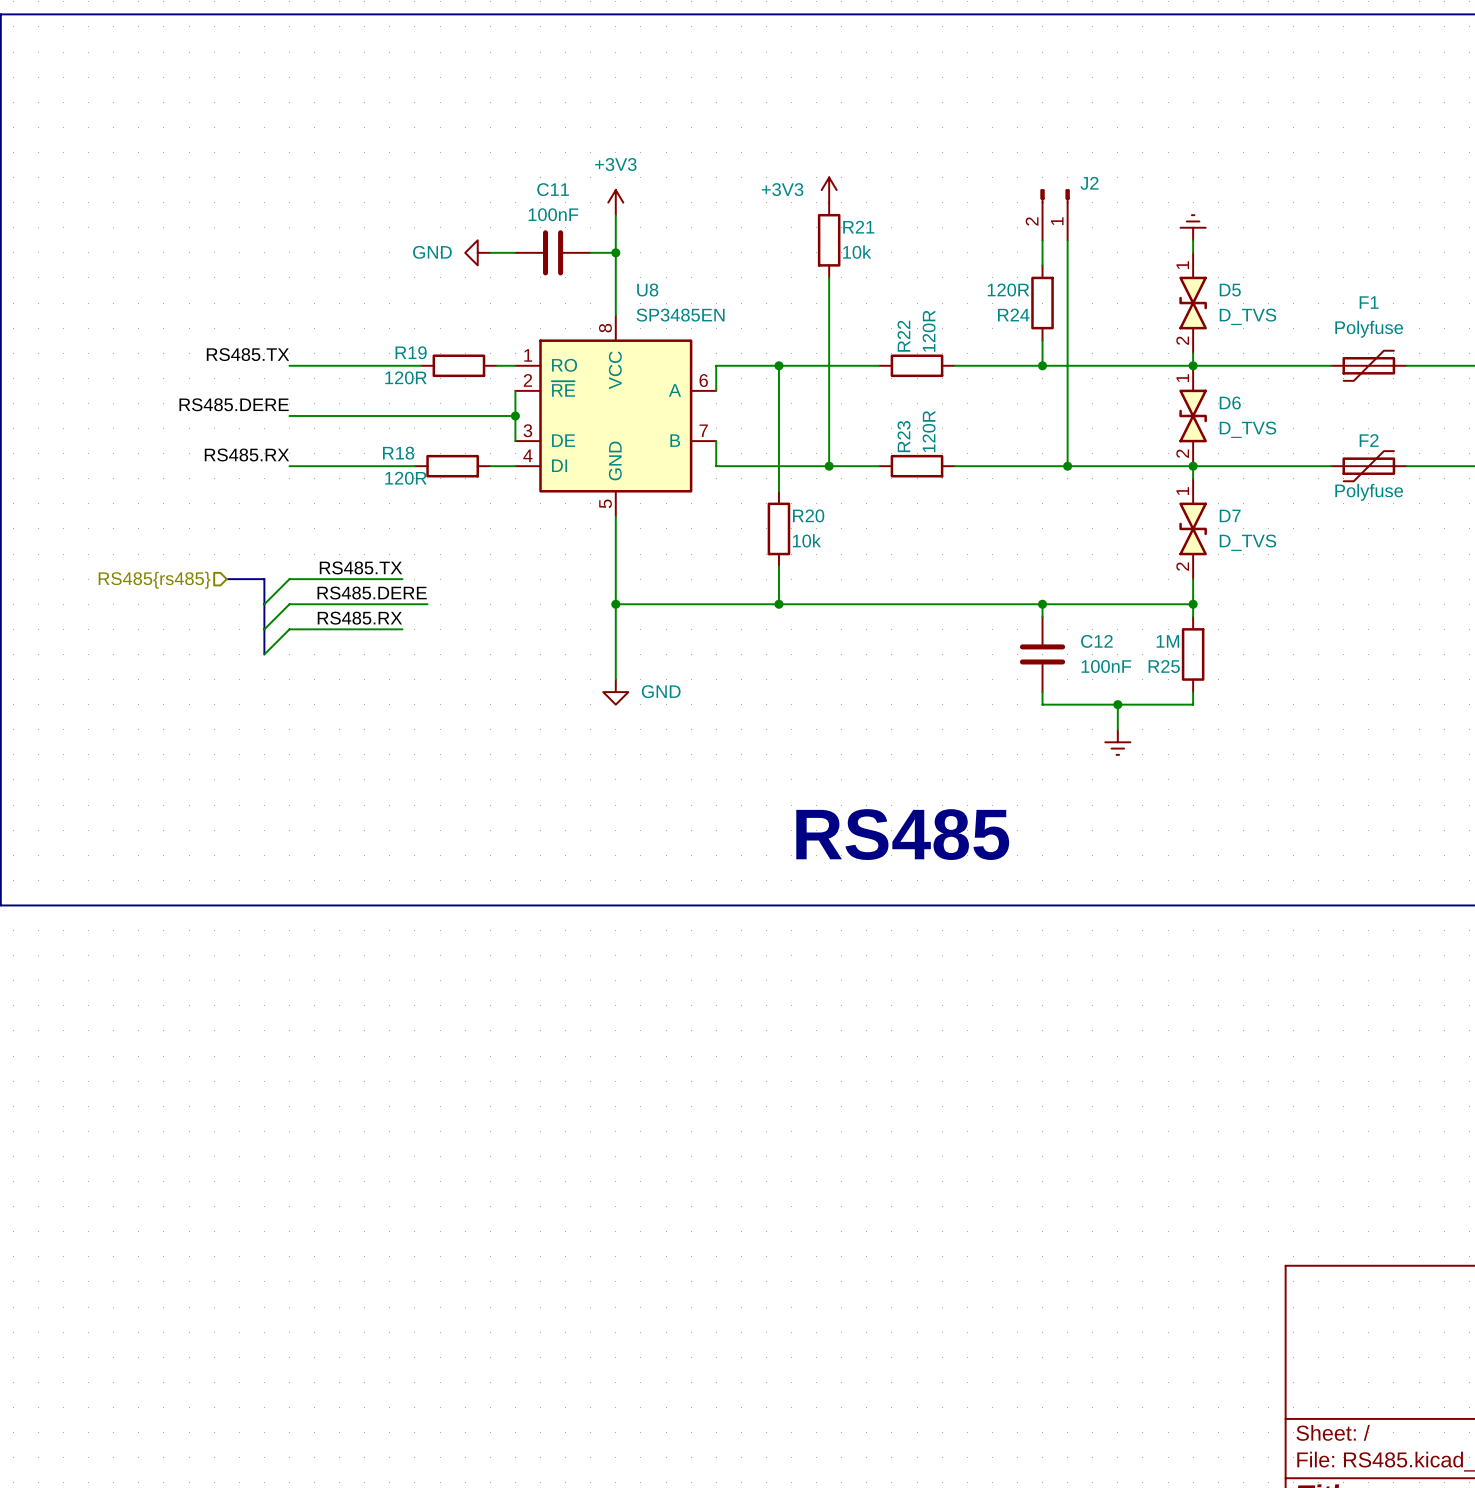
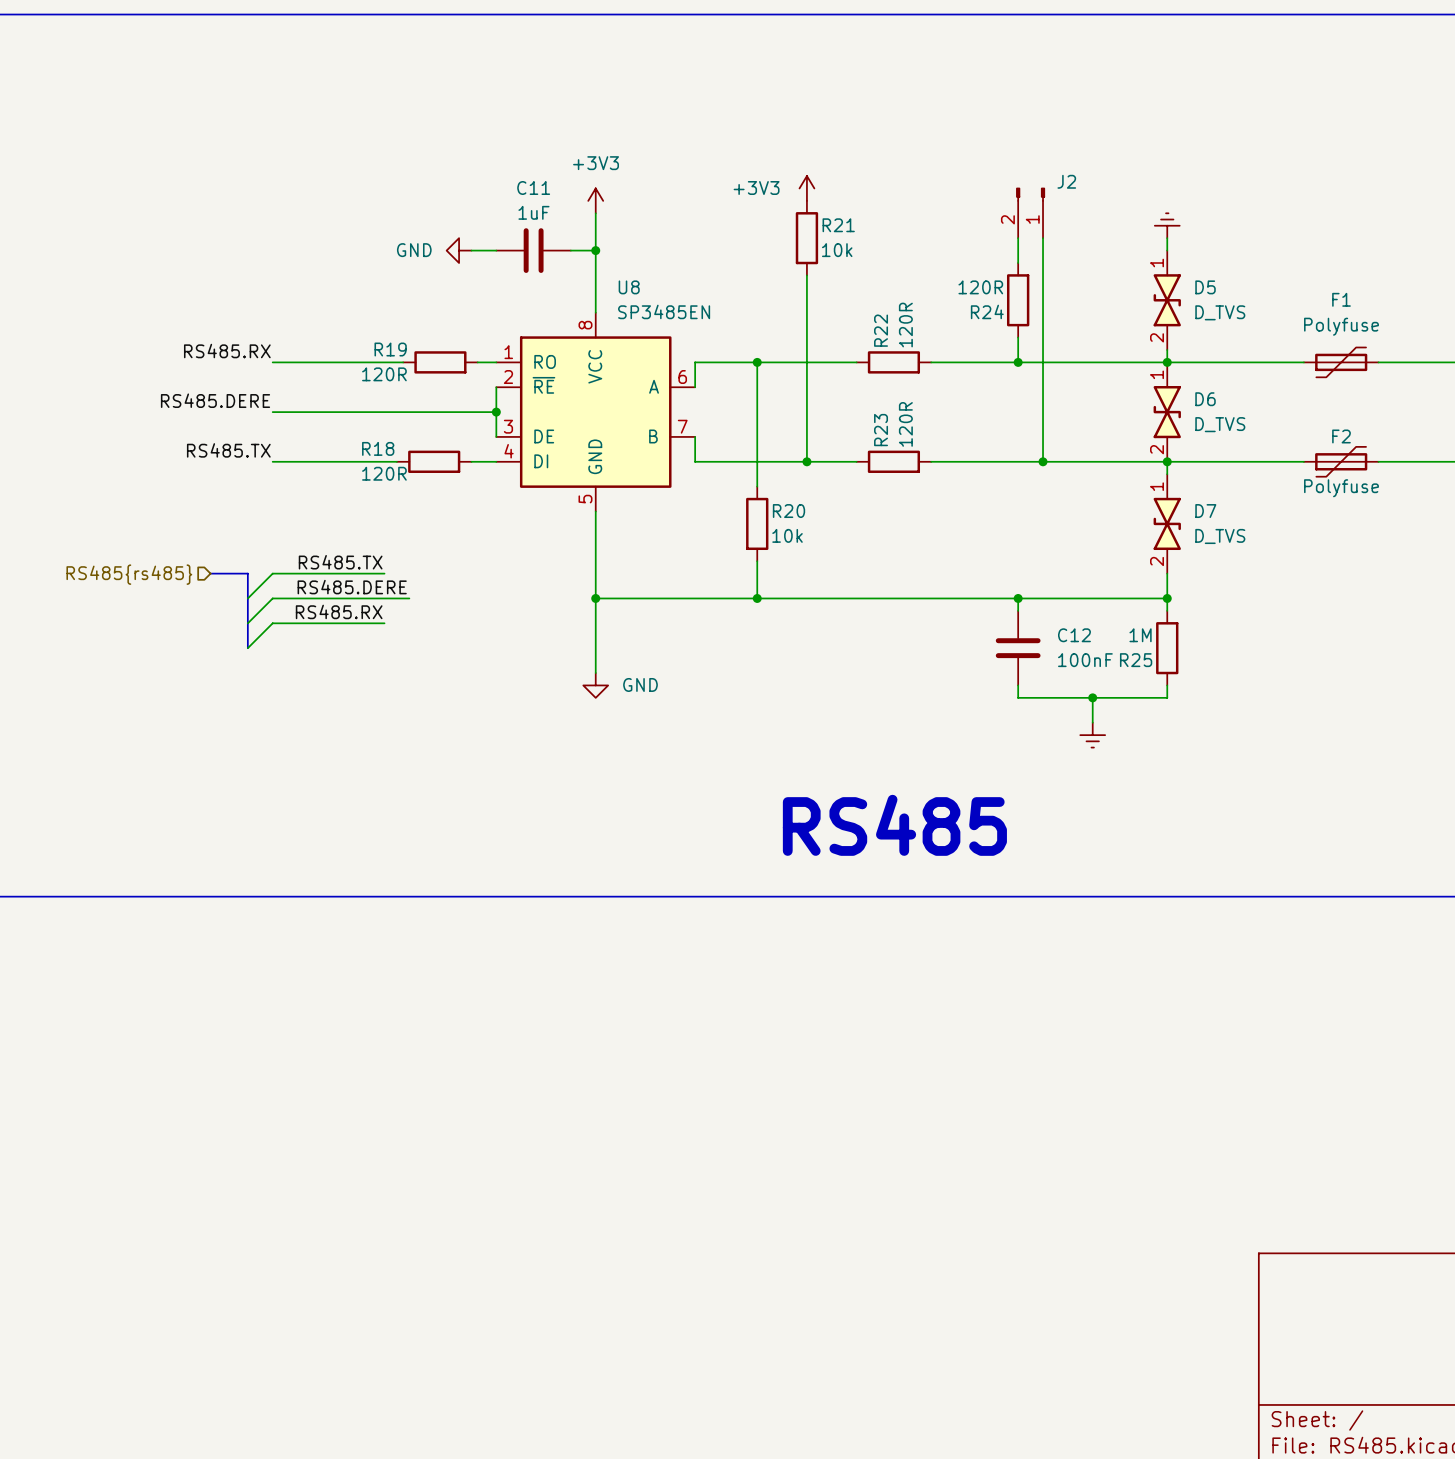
C11 value: 100nF (553, 214) -> 1uF (533, 212)
label: RS485.TX (247, 354) -> RS485.RX (227, 351)
label: RS485.RX (246, 454) -> RS485.TX (228, 450)

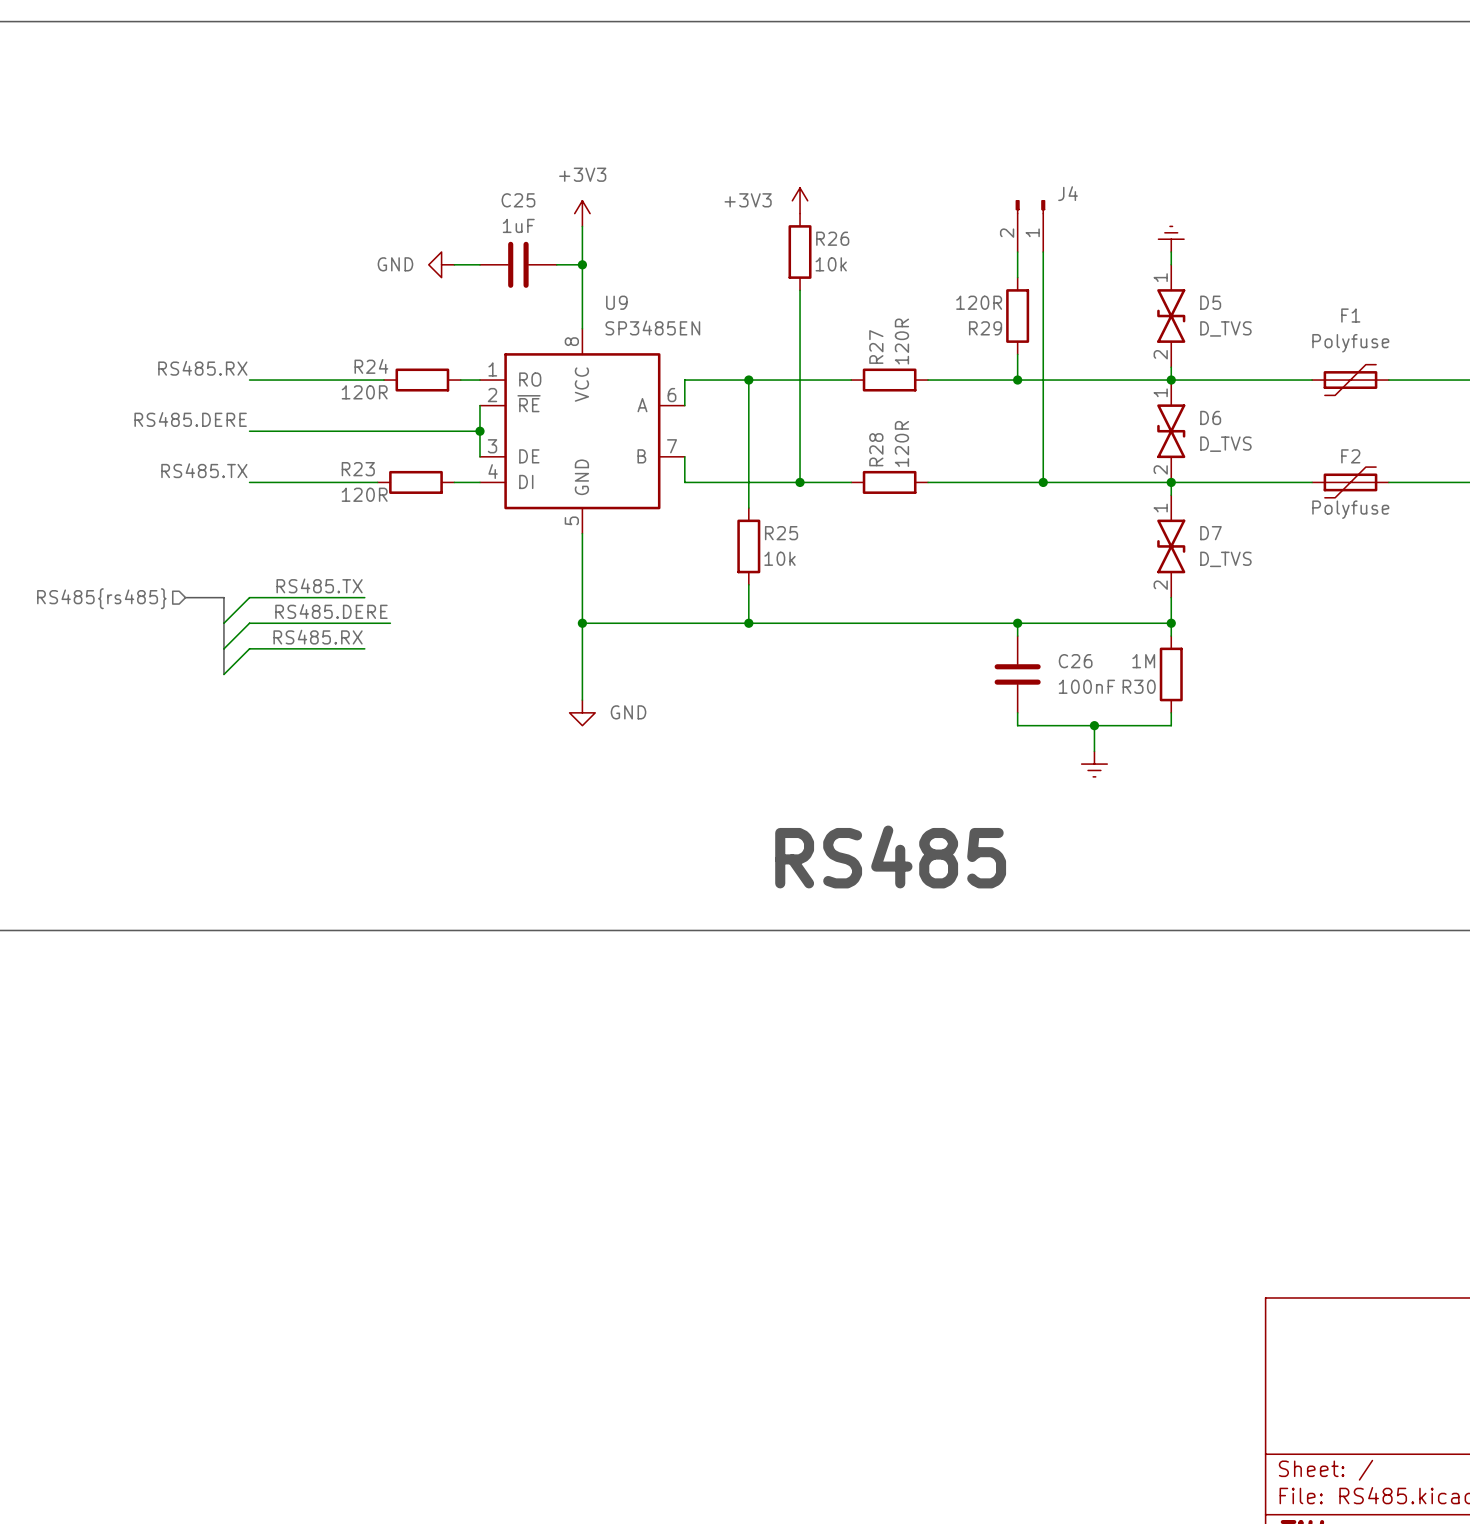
J2 name: J2 (1066, 181) -> J4 (1068, 193)
C11 name: C11 (533, 187) -> C25 (518, 200)
R21 name: R21 (838, 225) -> R26 (832, 238)
U8 name: U8 (629, 287) -> U9 (616, 302)
R24 name: R24 (987, 311) -> R29 (985, 328)
R22 name: R22 (881, 330) -> R27 (876, 347)
R19 name: R19 (390, 349) -> R24 (371, 366)
R23 name: R23 (881, 430) -> R28 (876, 449)
R18 name: R18 (378, 448) -> R23 (358, 469)
R20 name: R20 (789, 511) -> R25 (781, 533)
C12 name: C12 (1074, 635) -> C26 (1075, 661)
R25 name: R25 (1136, 660) -> R30 (1139, 686)

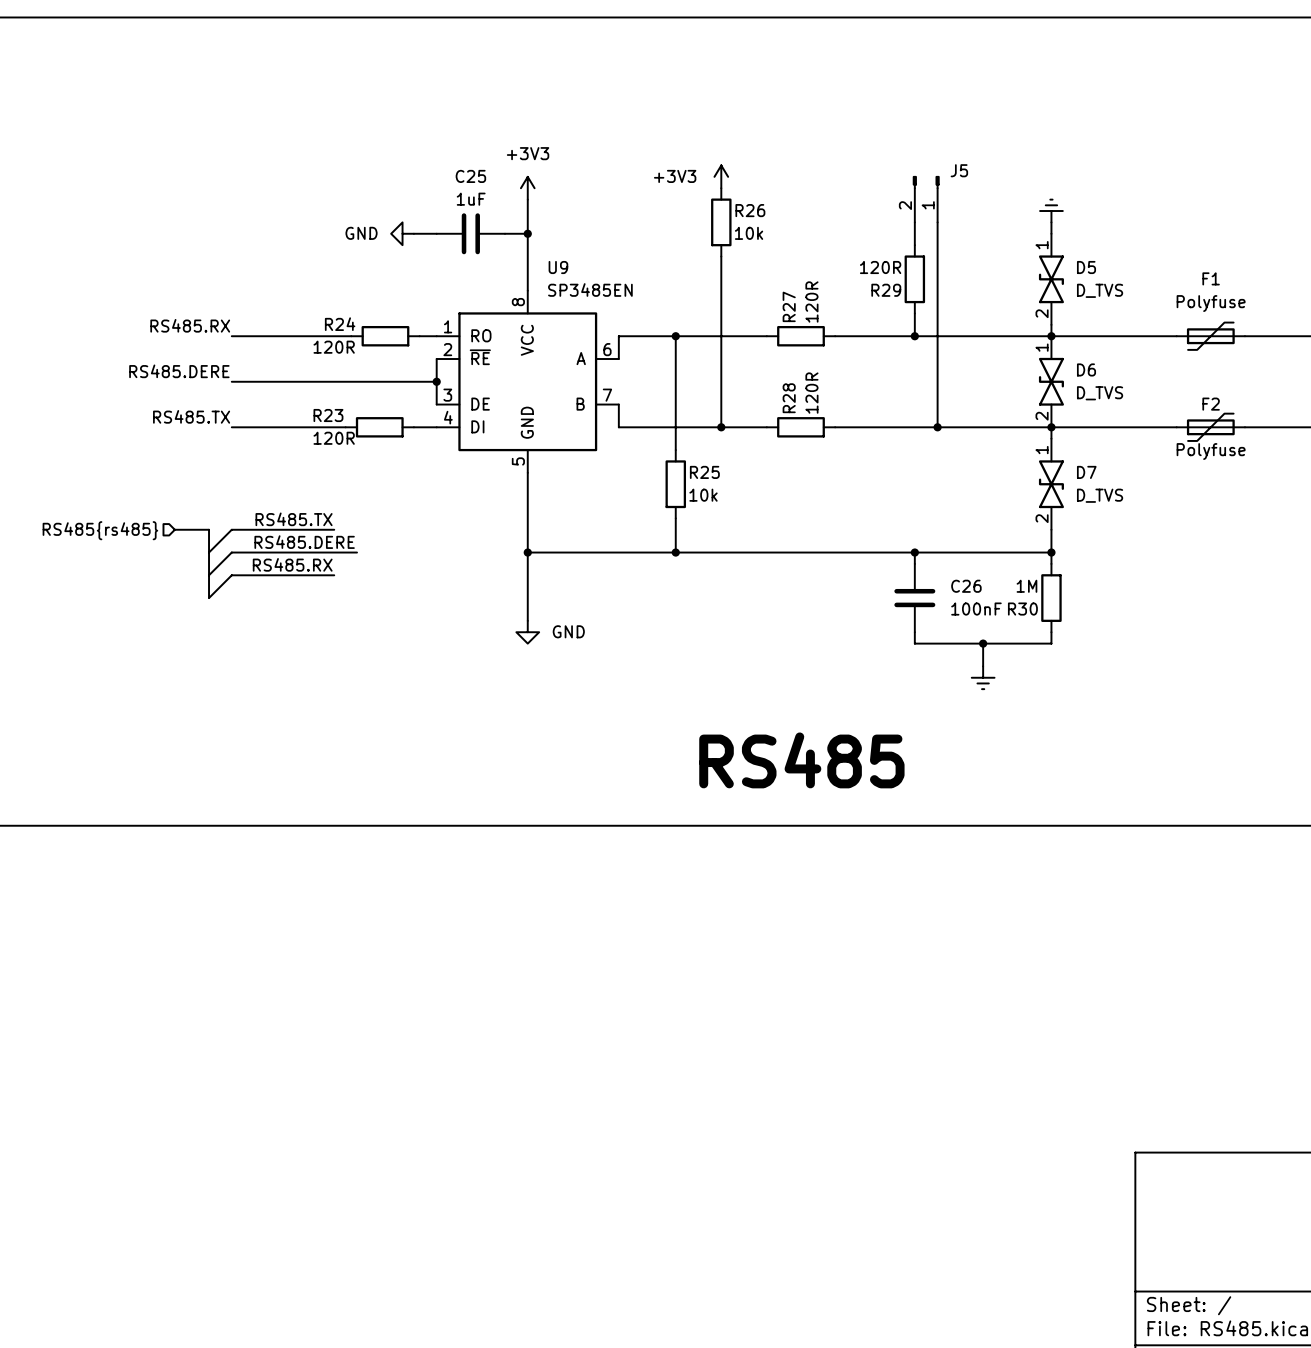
J4 name: J4 (1068, 193) -> J5 (959, 170)

